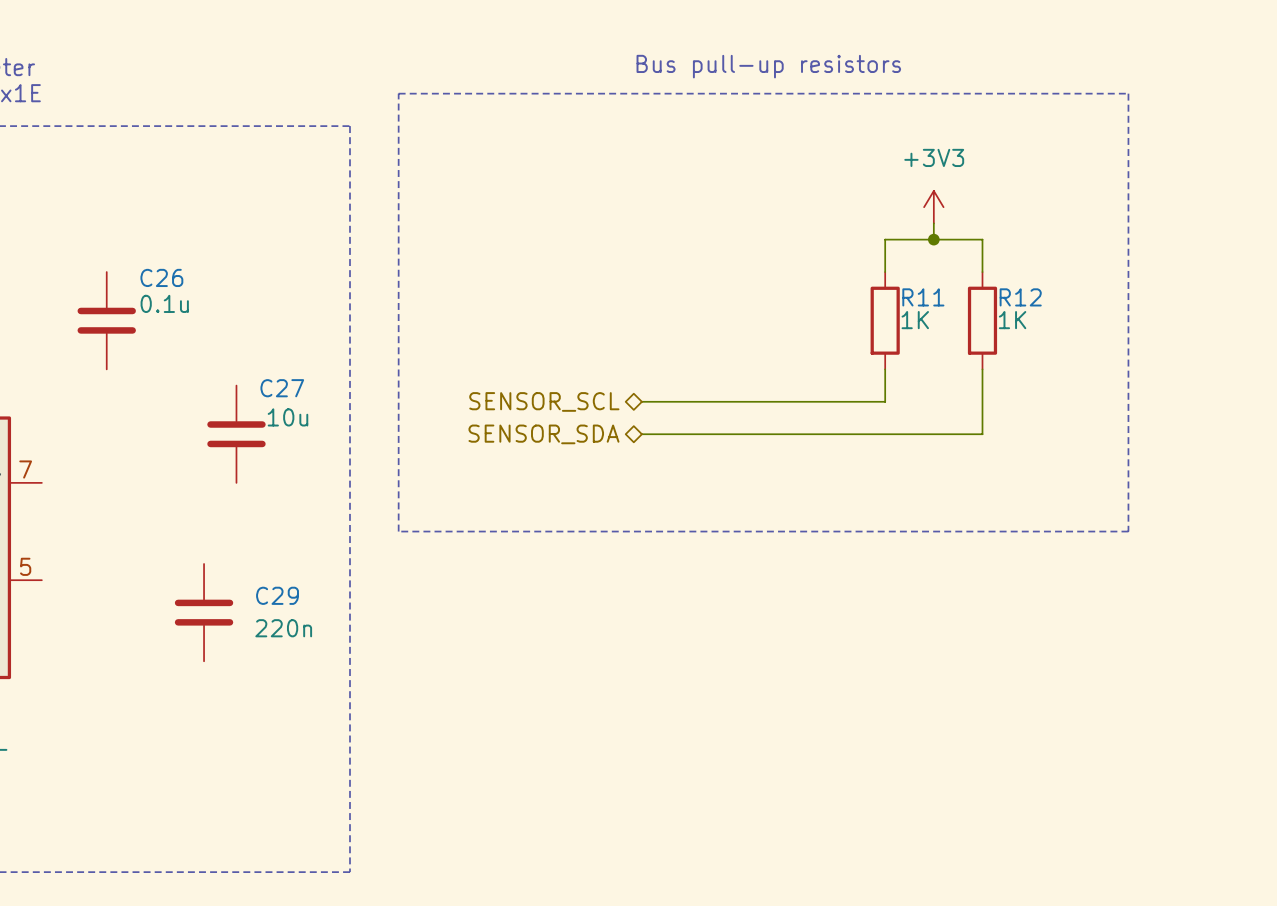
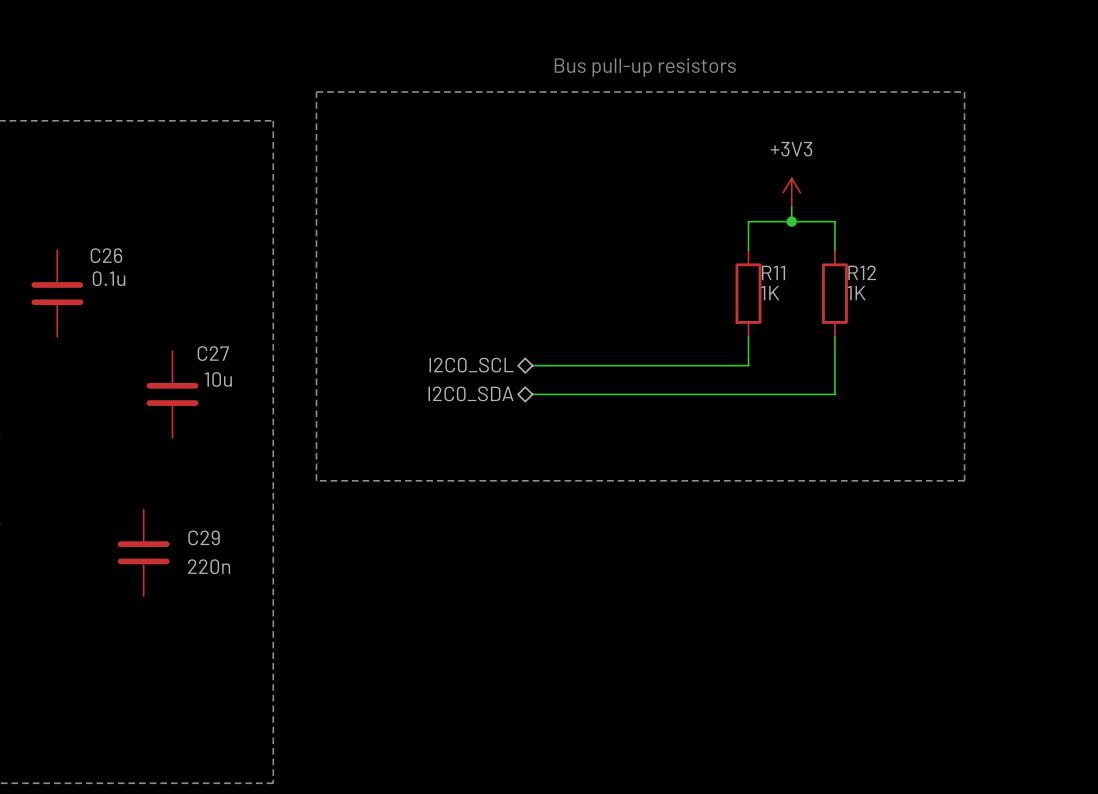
hierarchical label: SENSOR_SCL (544, 401) -> I2C0_SCL (471, 365)
hierarchical label: SENSOR_SDA (543, 434) -> I2C0_SDA (471, 393)

